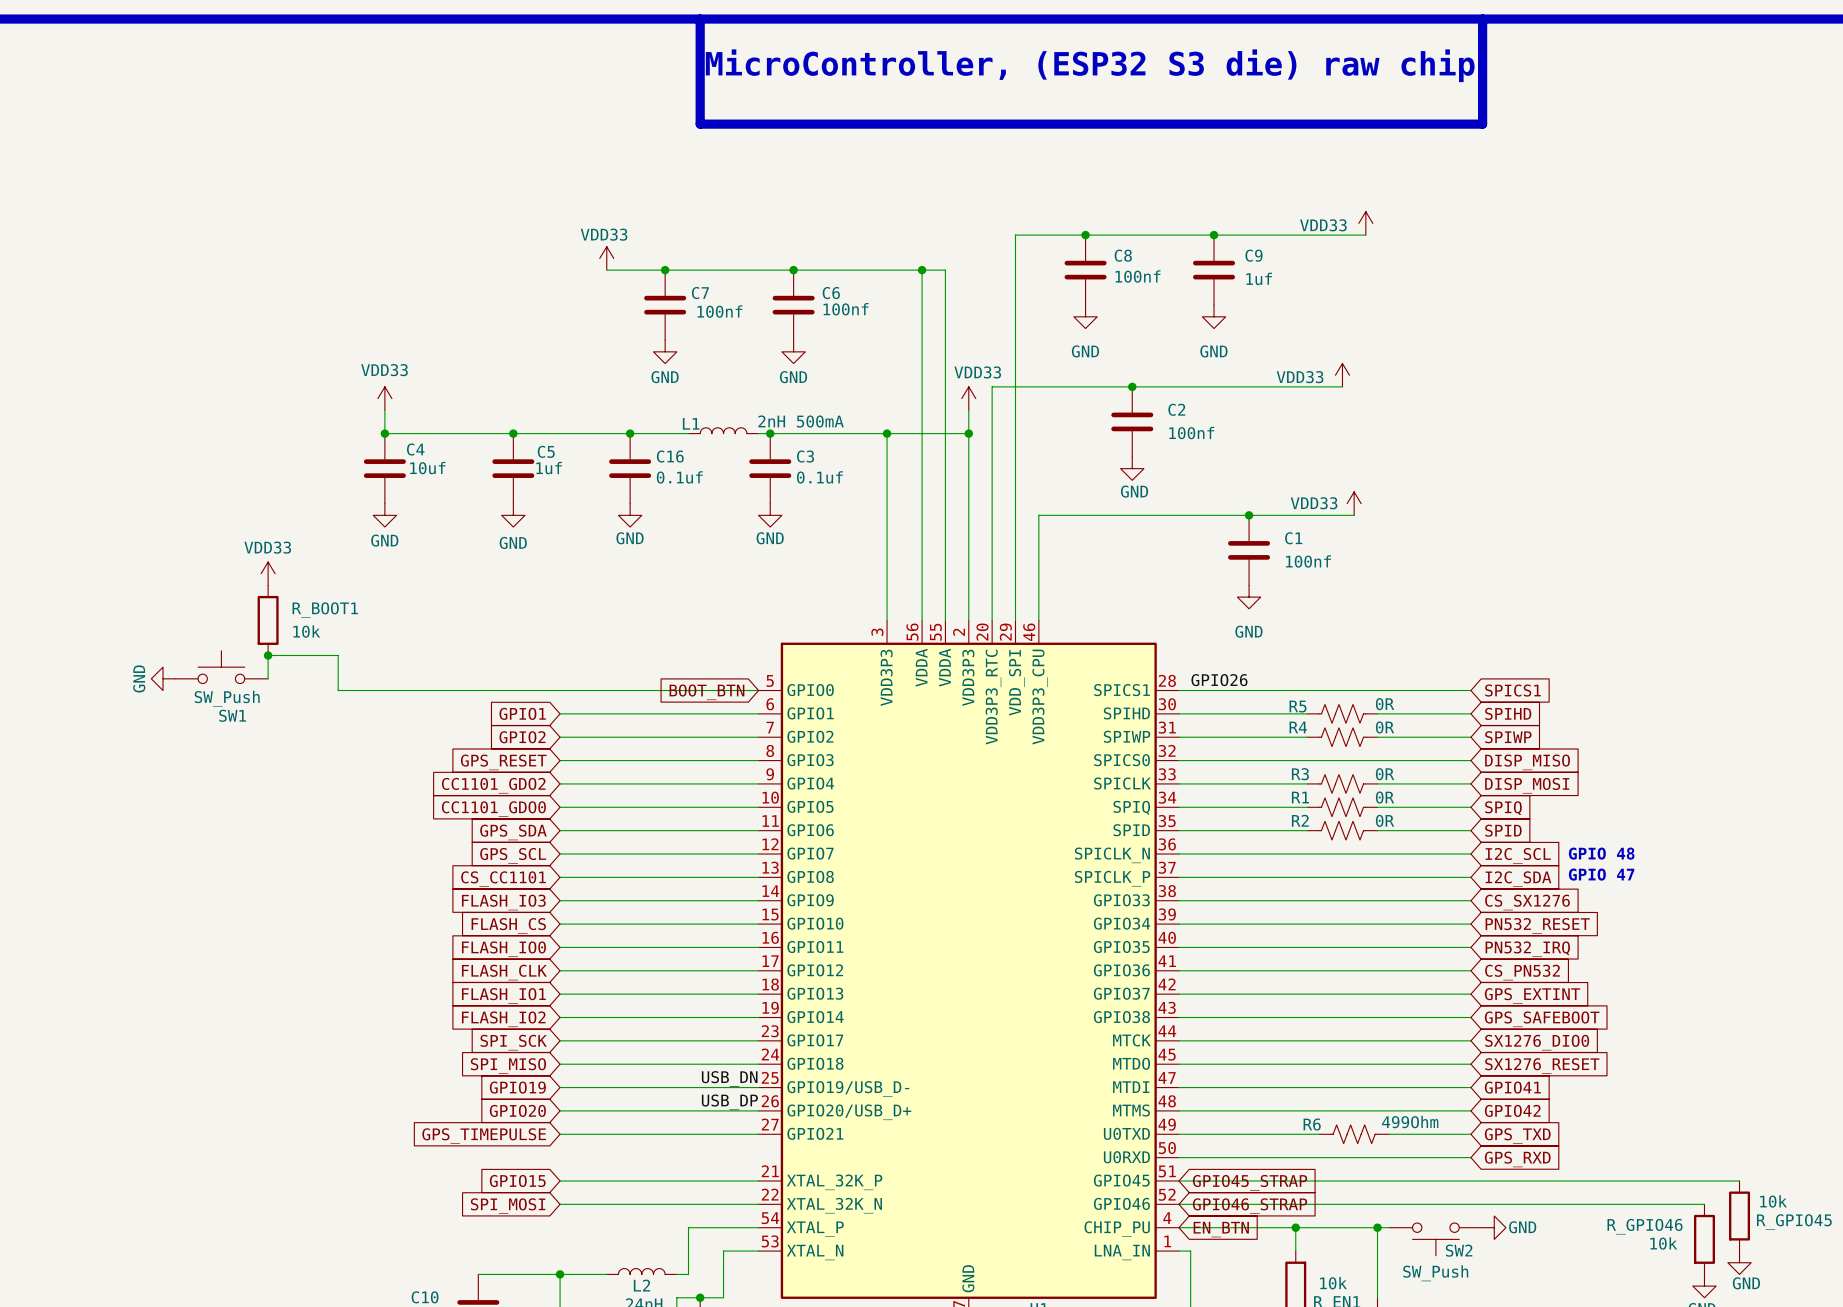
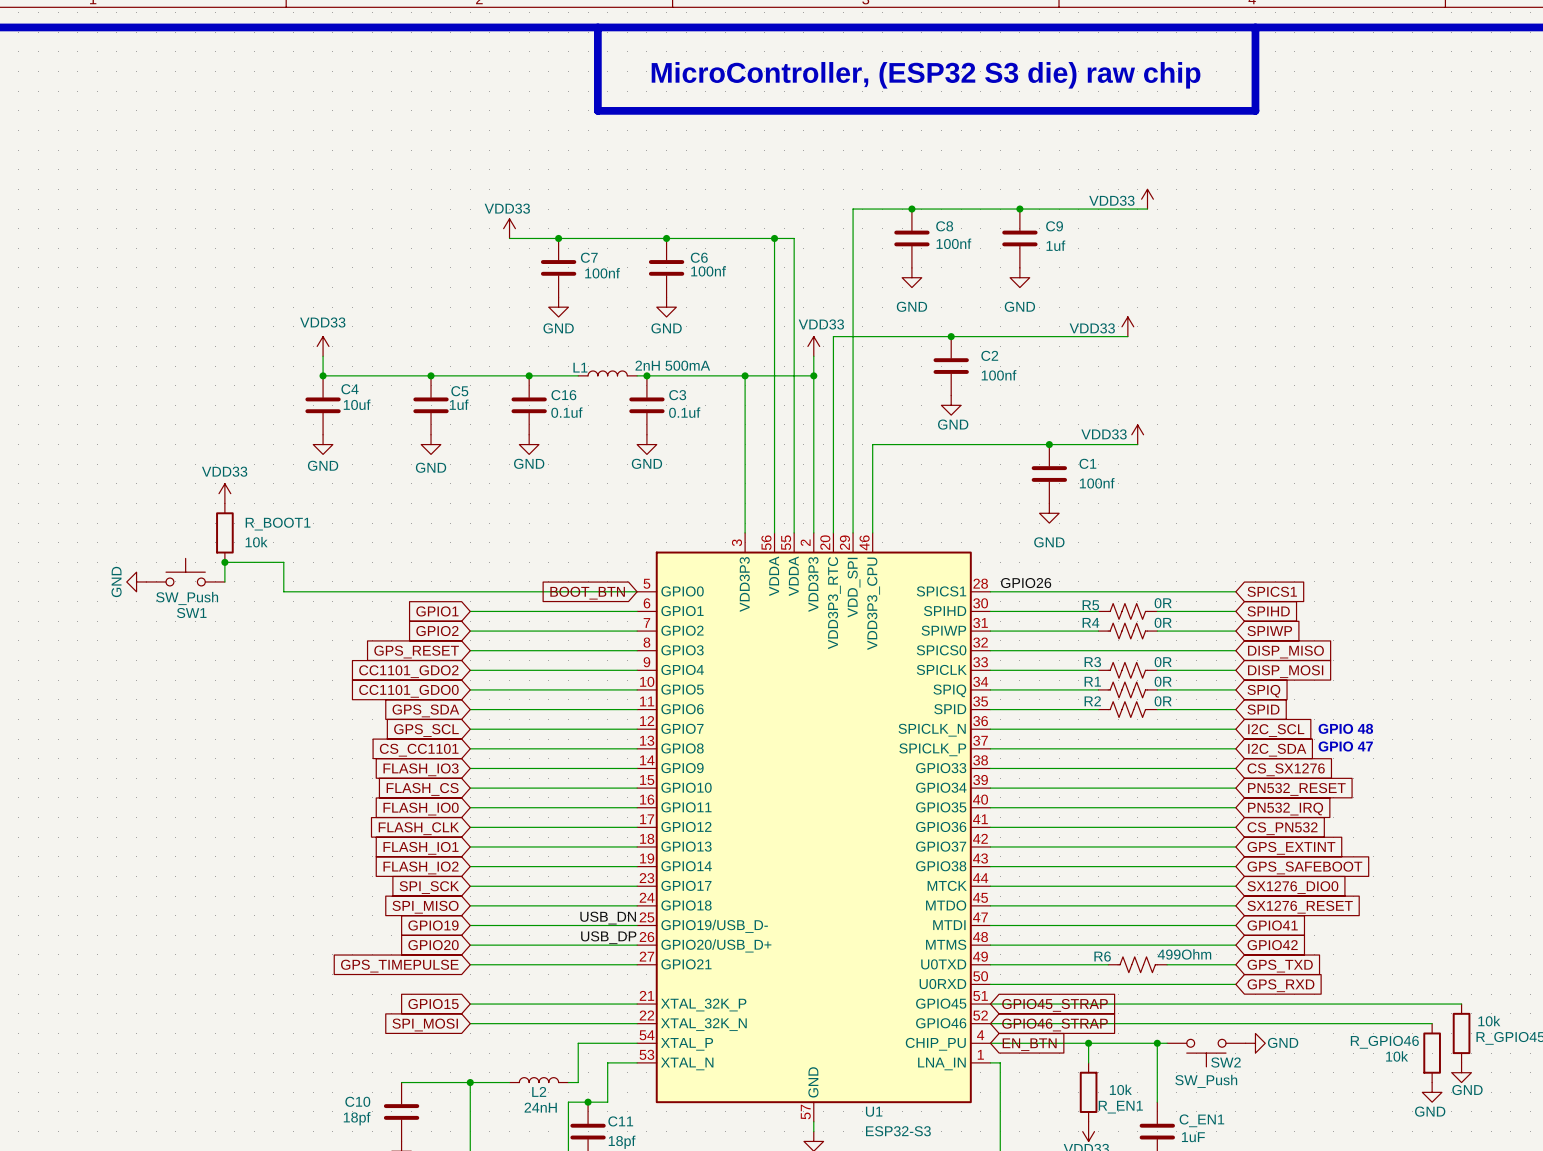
line: (700, 19) (700, 124) (1482, 124) (1482, 19) -> none
line: none -> (597, 27) (597, 110) (1255, 110) (1255, 27)
text position: MicroController, (ESP32 S3 die) raw chip (1090, 65) -> MicroController, (ESP32 S3 die) raw chip (926, 75)

